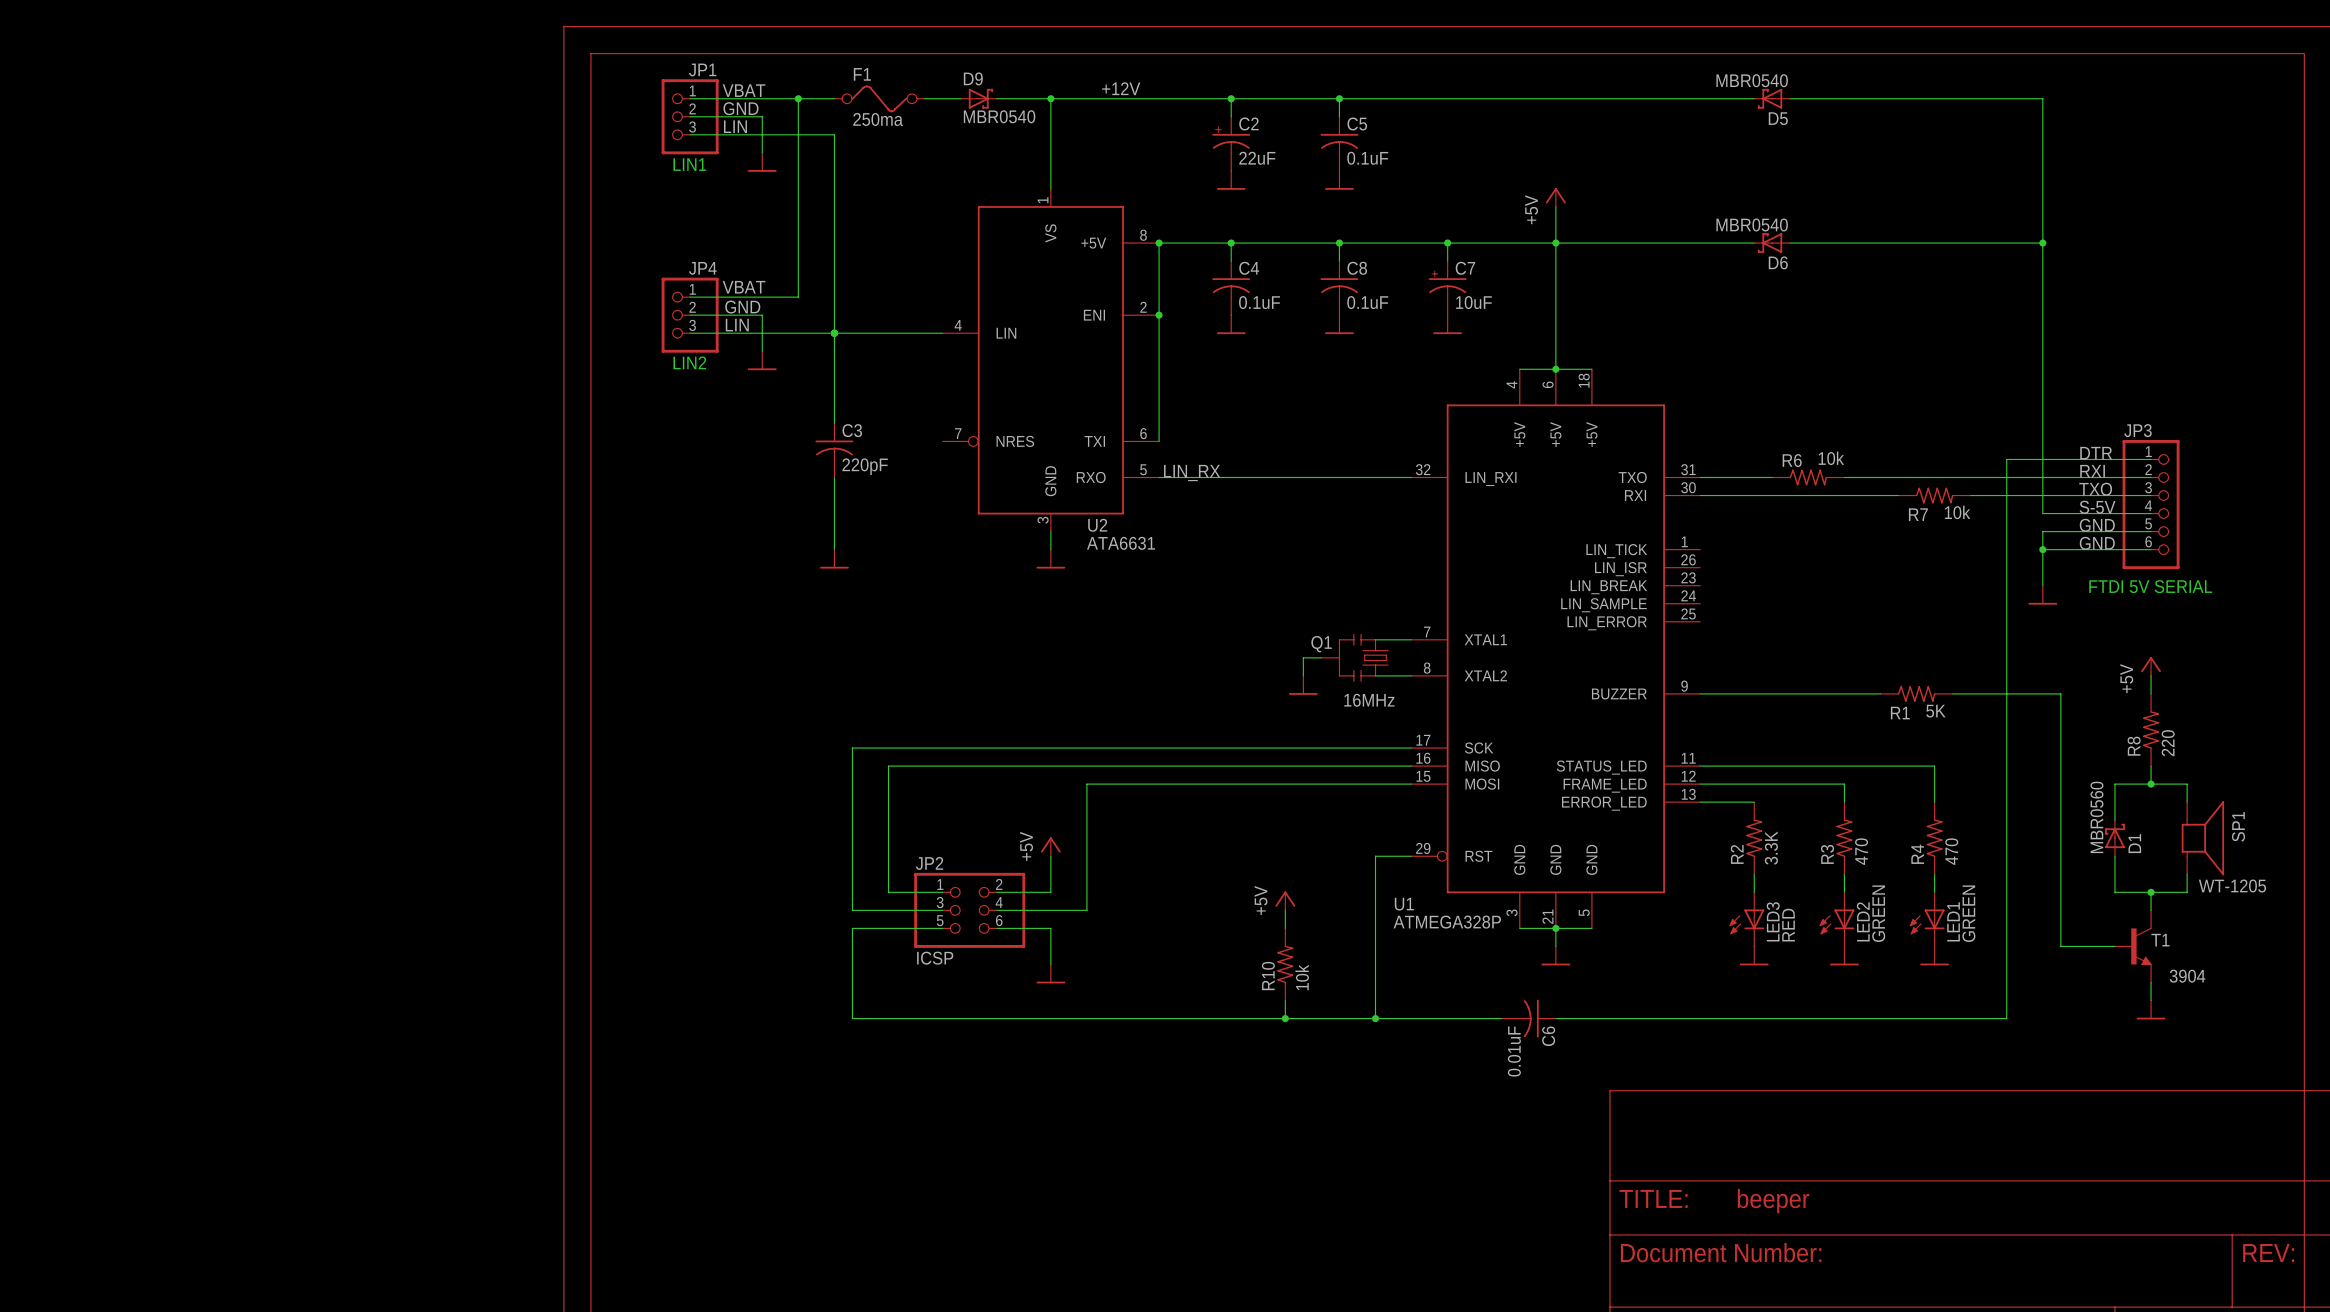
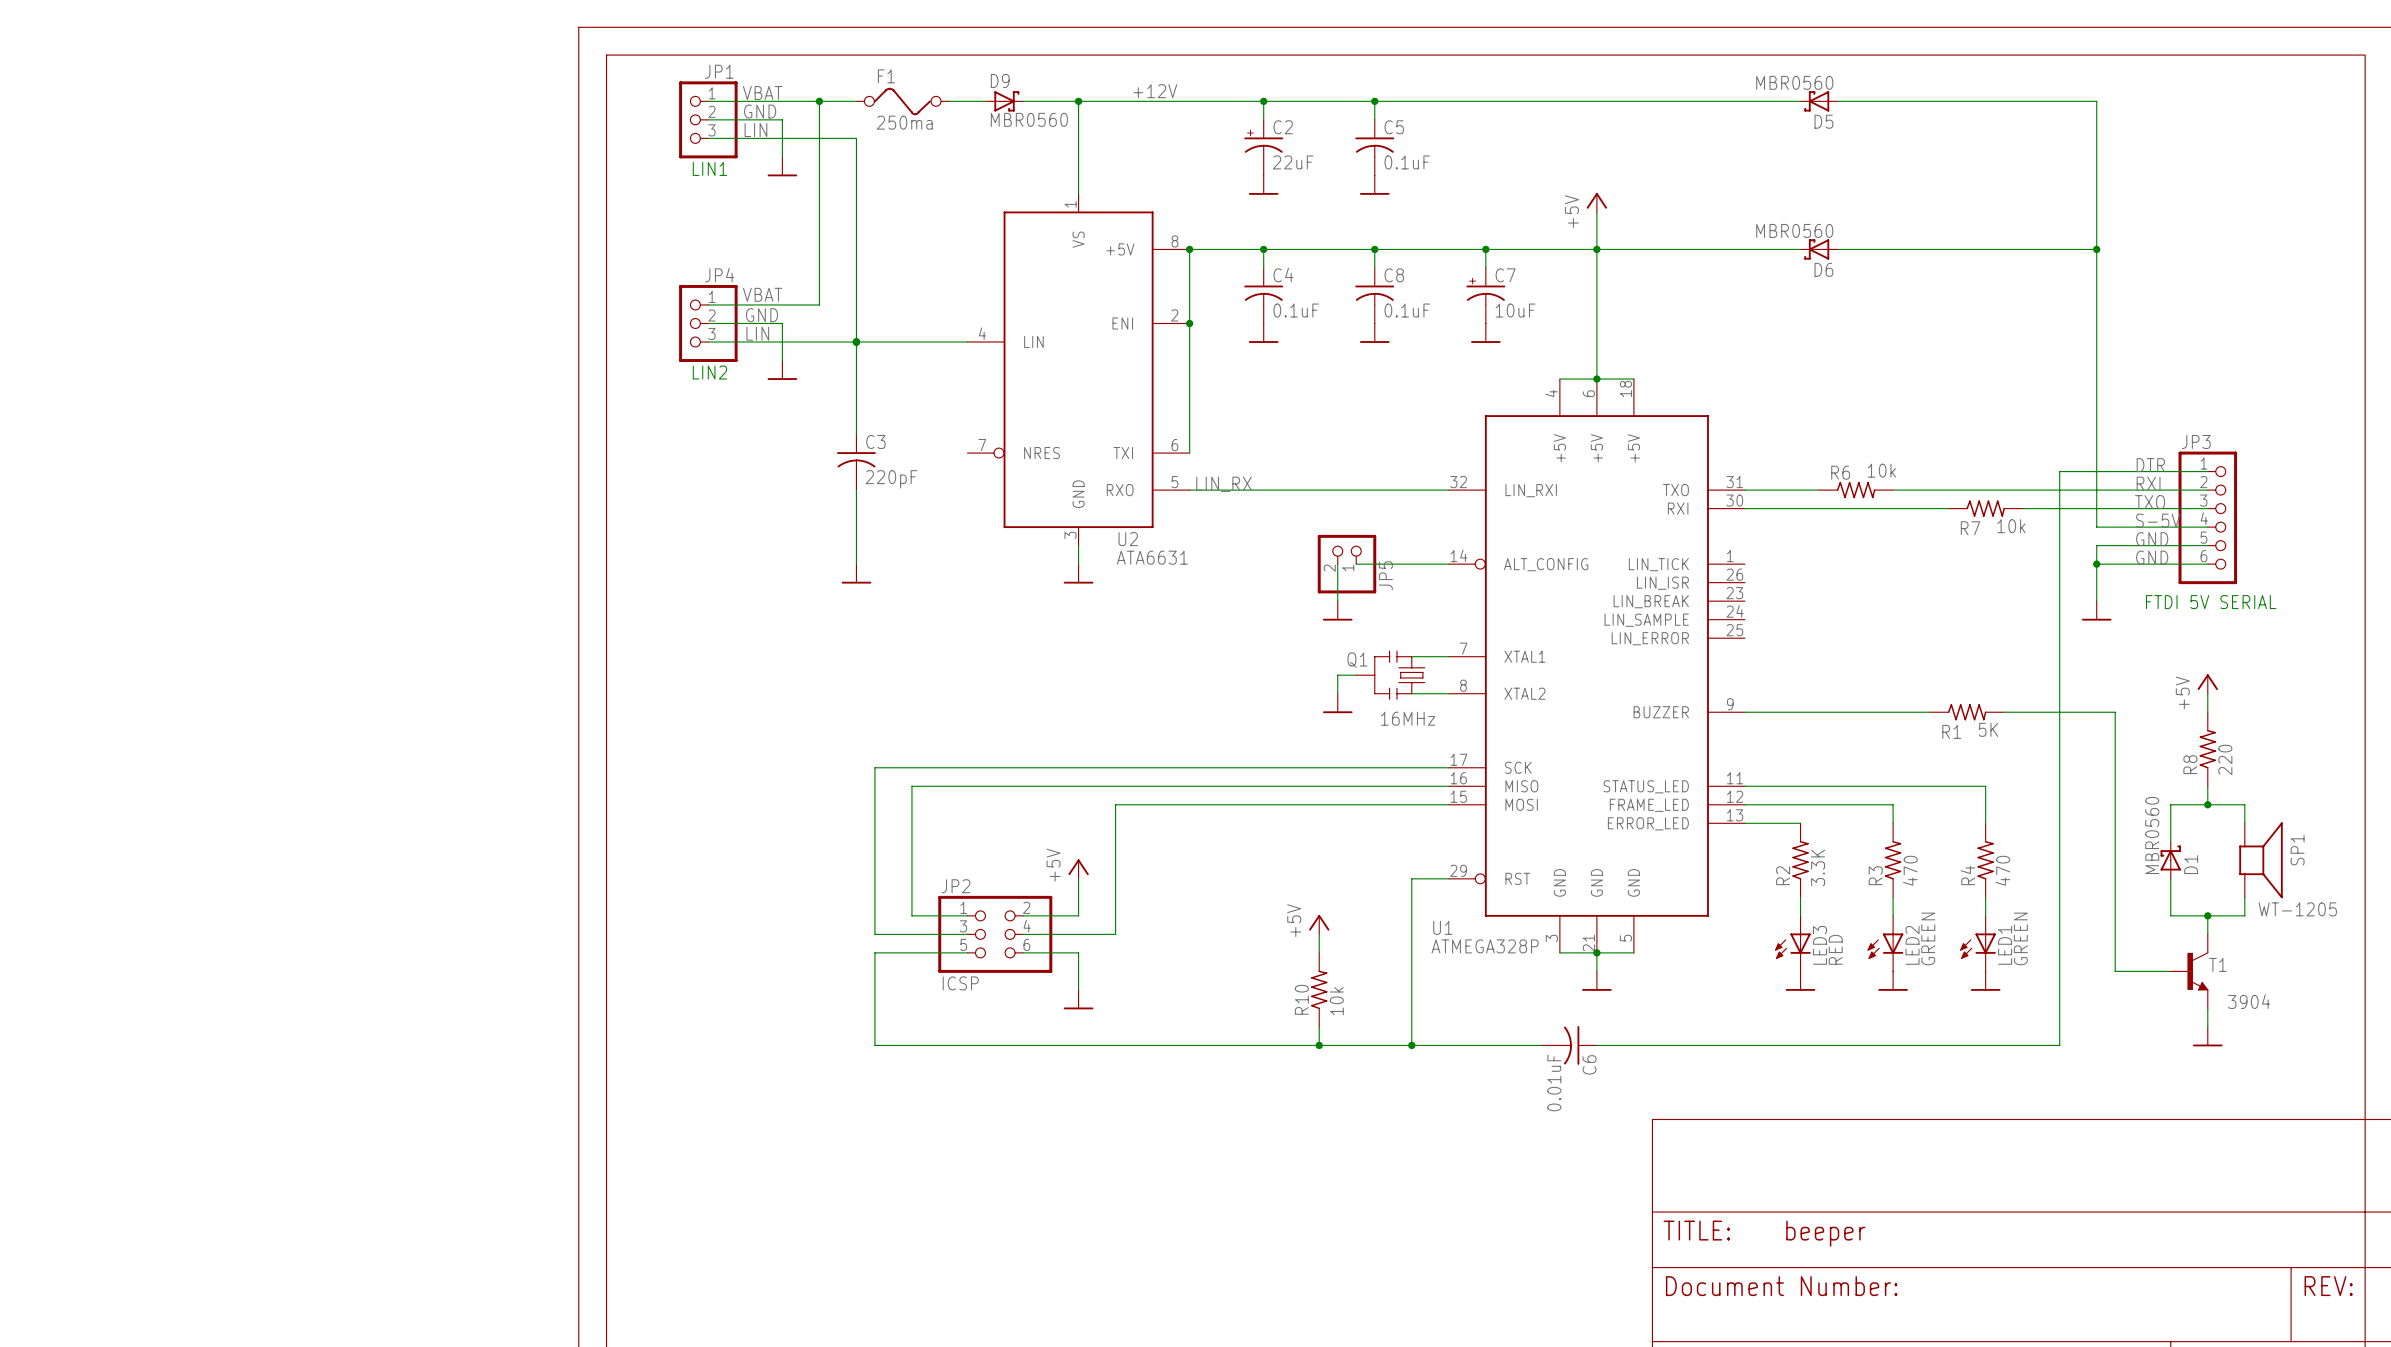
D5 value: MBR0540 (1752, 80) -> MBR0560 (1794, 82)
D9 value: MBR0540 (999, 116) -> MBR0560 (1029, 119)
D6 value: MBR0540 (1752, 224) -> MBR0560 (1794, 230)
U1 symbol: [1411, 369, 1701, 929] -> [1448, 379, 1746, 953]
wire: none -> (1337, 564) (1337, 601)
JP5: none -> (1347, 564)
wire: none -> (1356, 564) (1448, 564)
power symbol: none -> (1337, 610)

